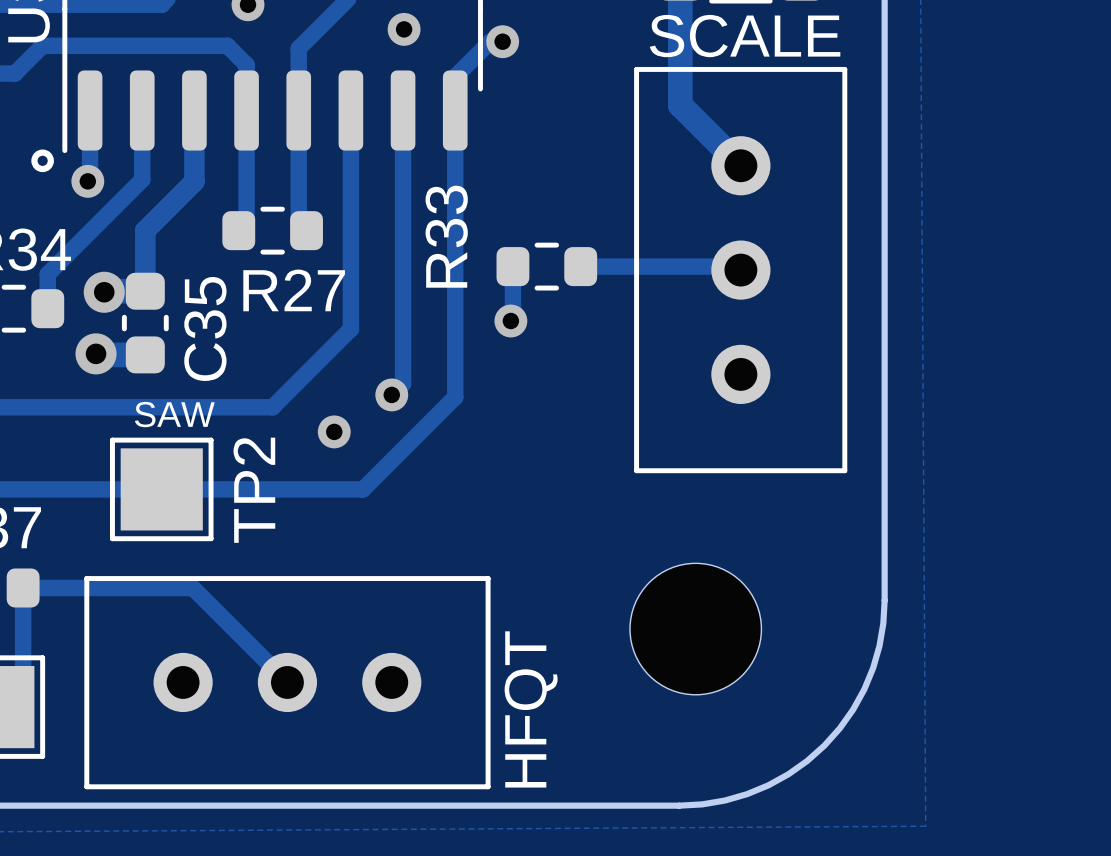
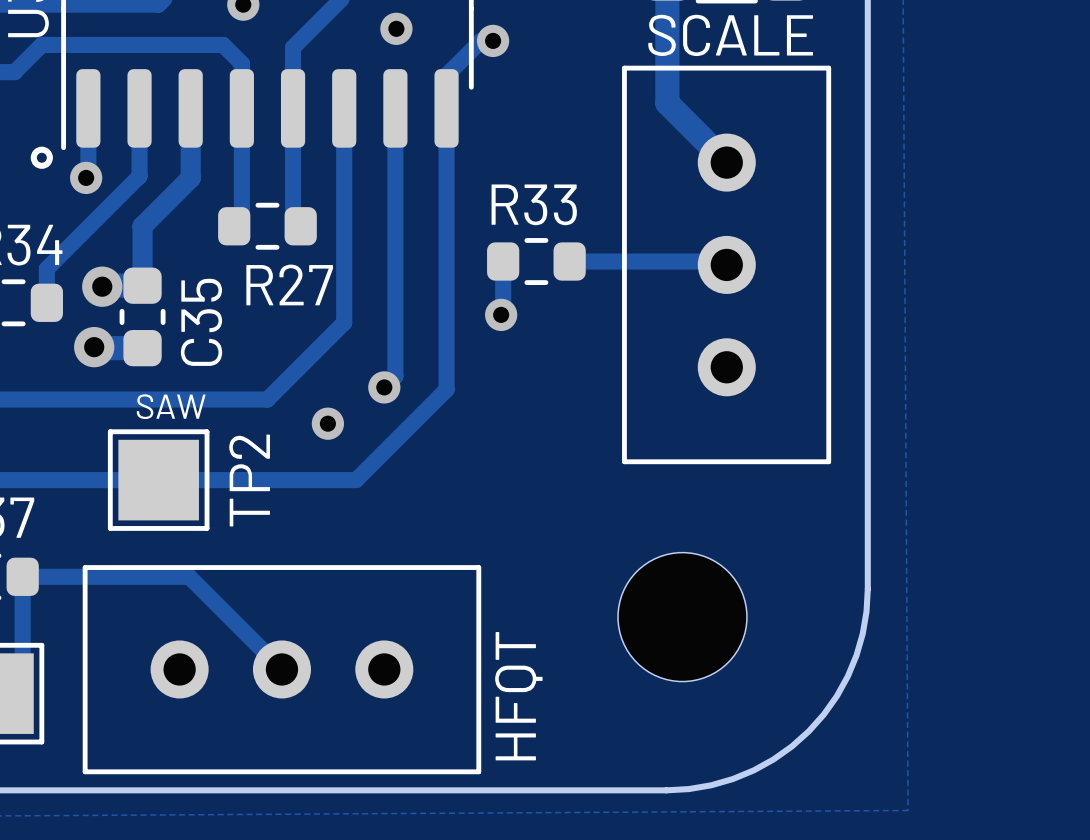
R33 name rotation: 0° (446, 236) -> 90° clockwise (534, 204)

